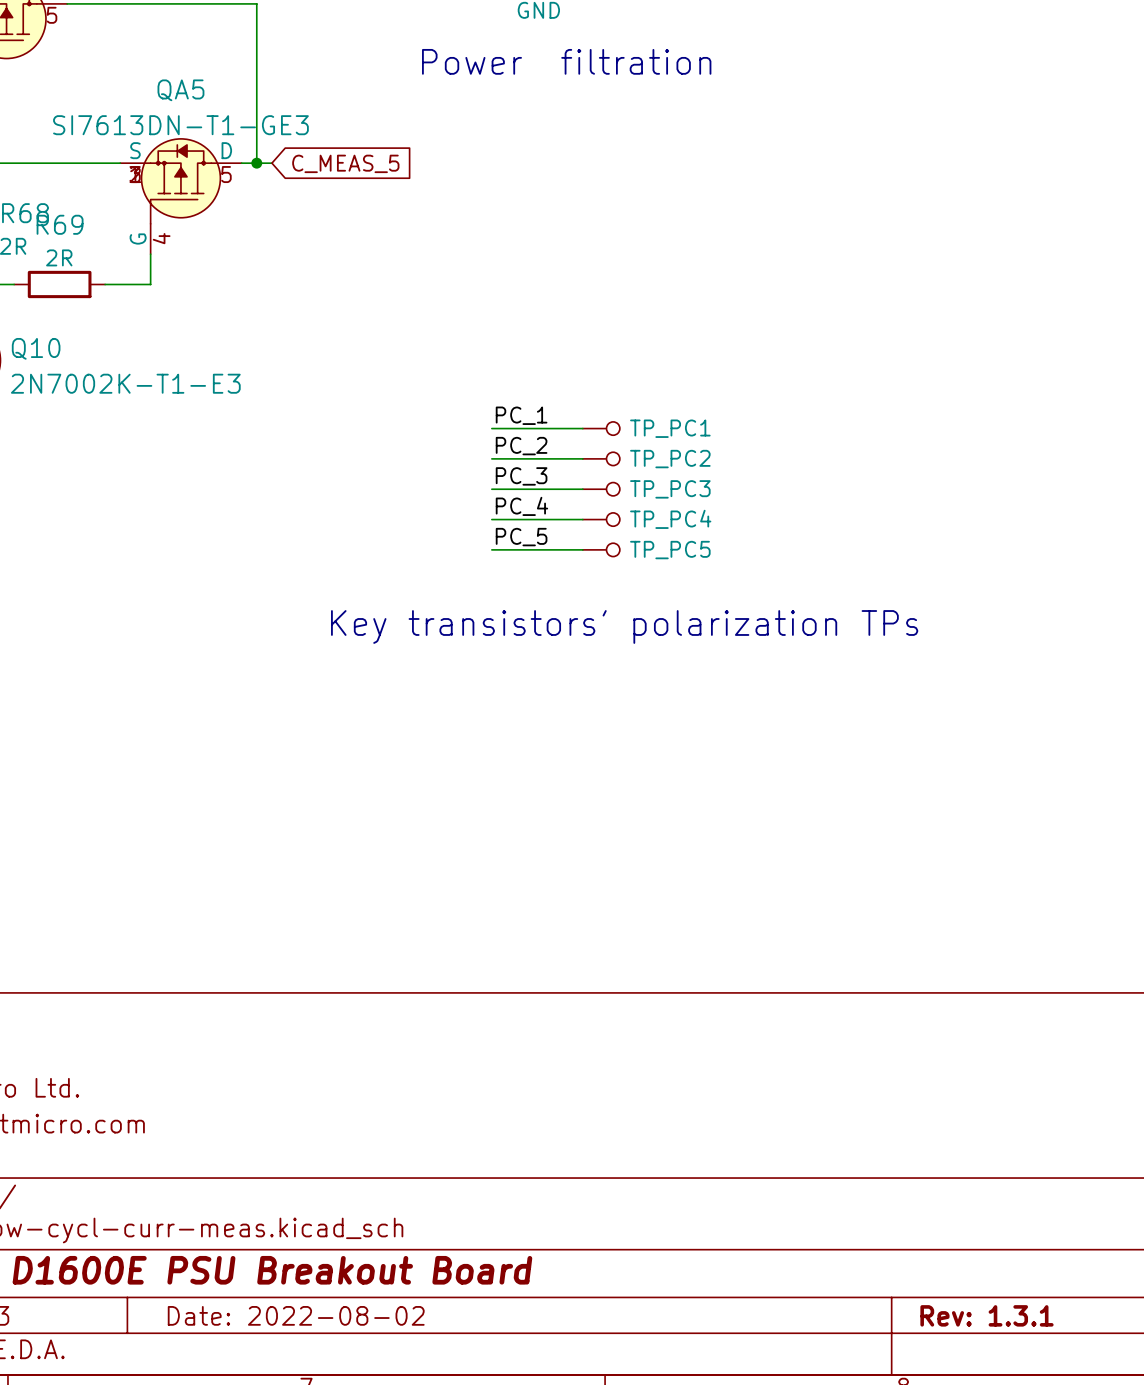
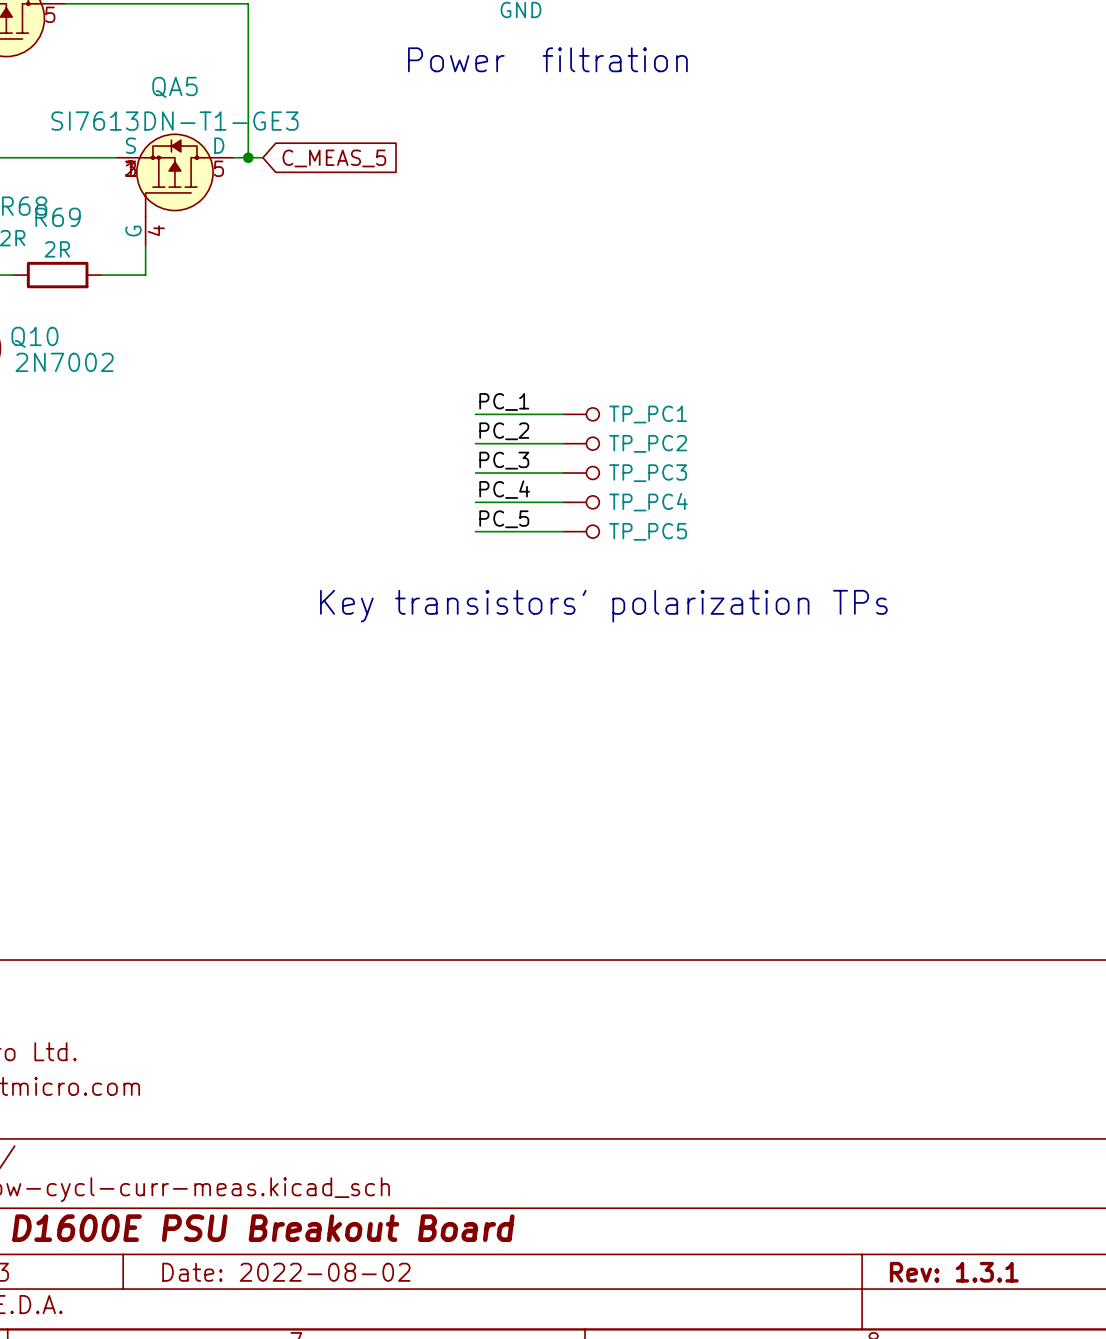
Q10 value: 2N7002K-T1-E3 (125, 383) -> 2N7002 (64, 362)

